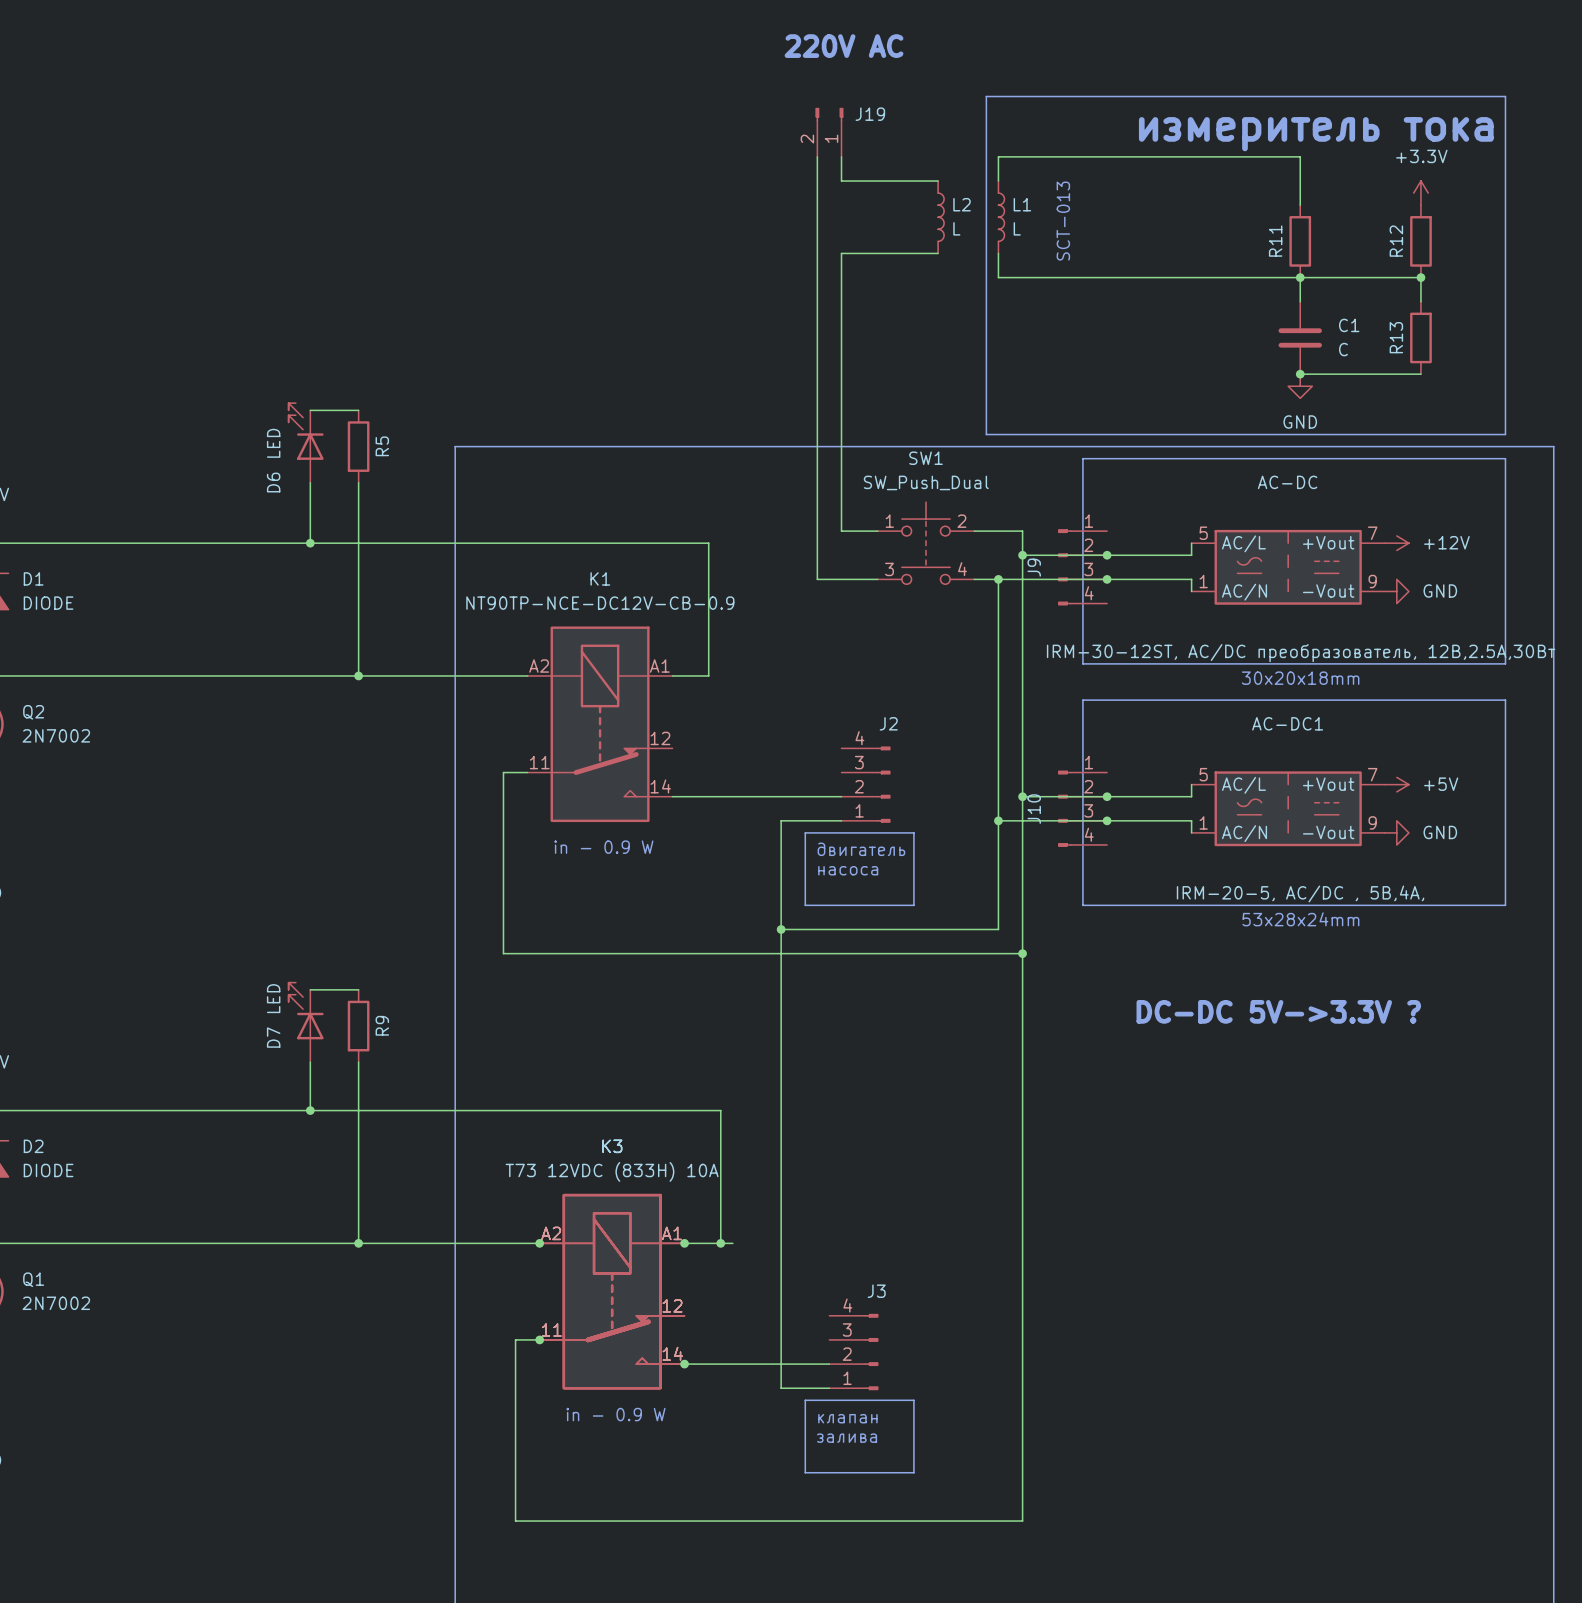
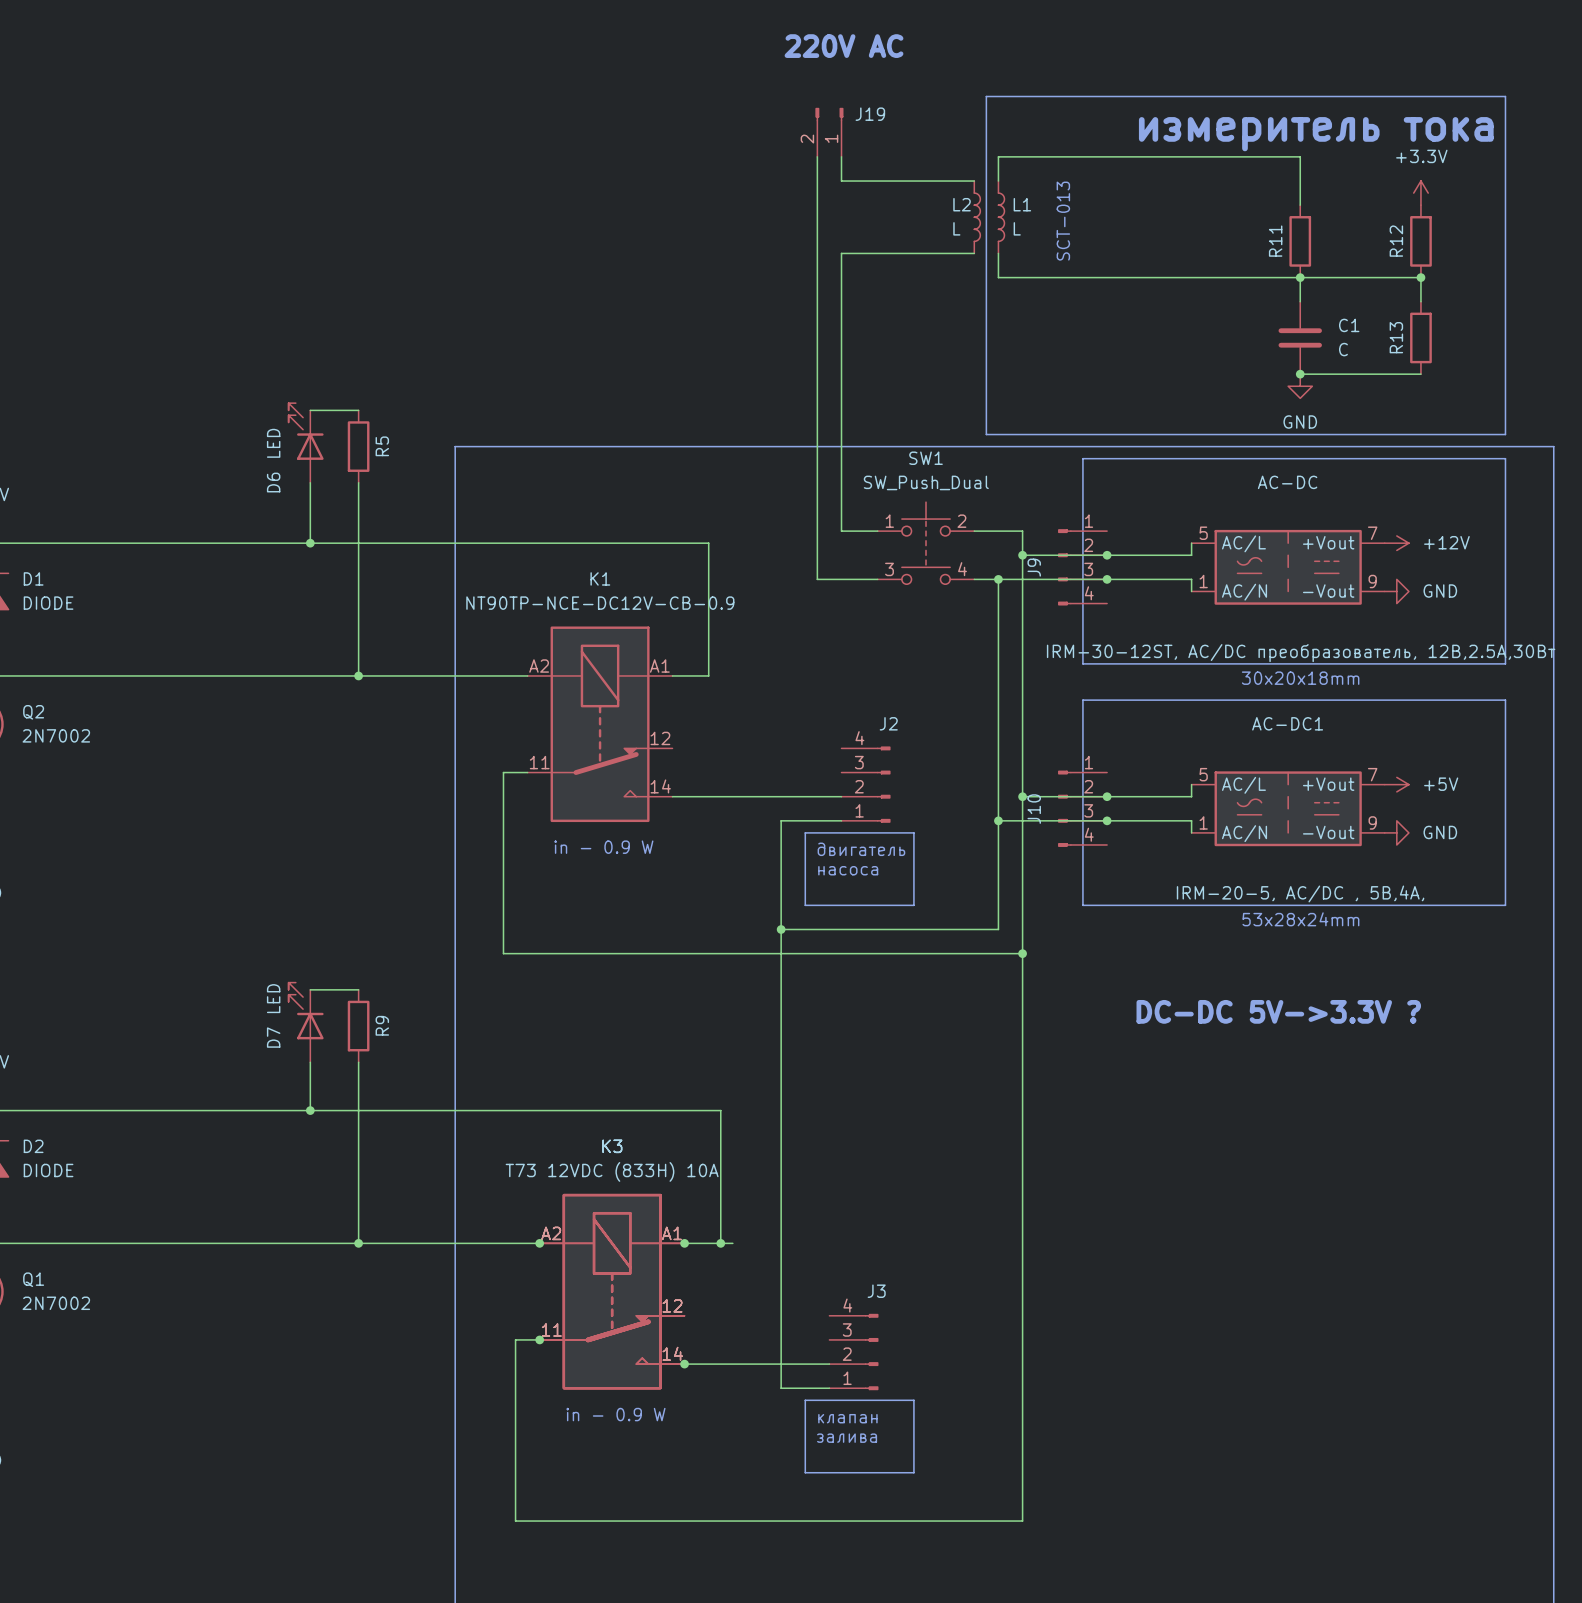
wire: none -> (938, 181) (974, 181)
L2 position: (941, 217) -> (977, 217)
wire: none -> (938, 253) (974, 253)

